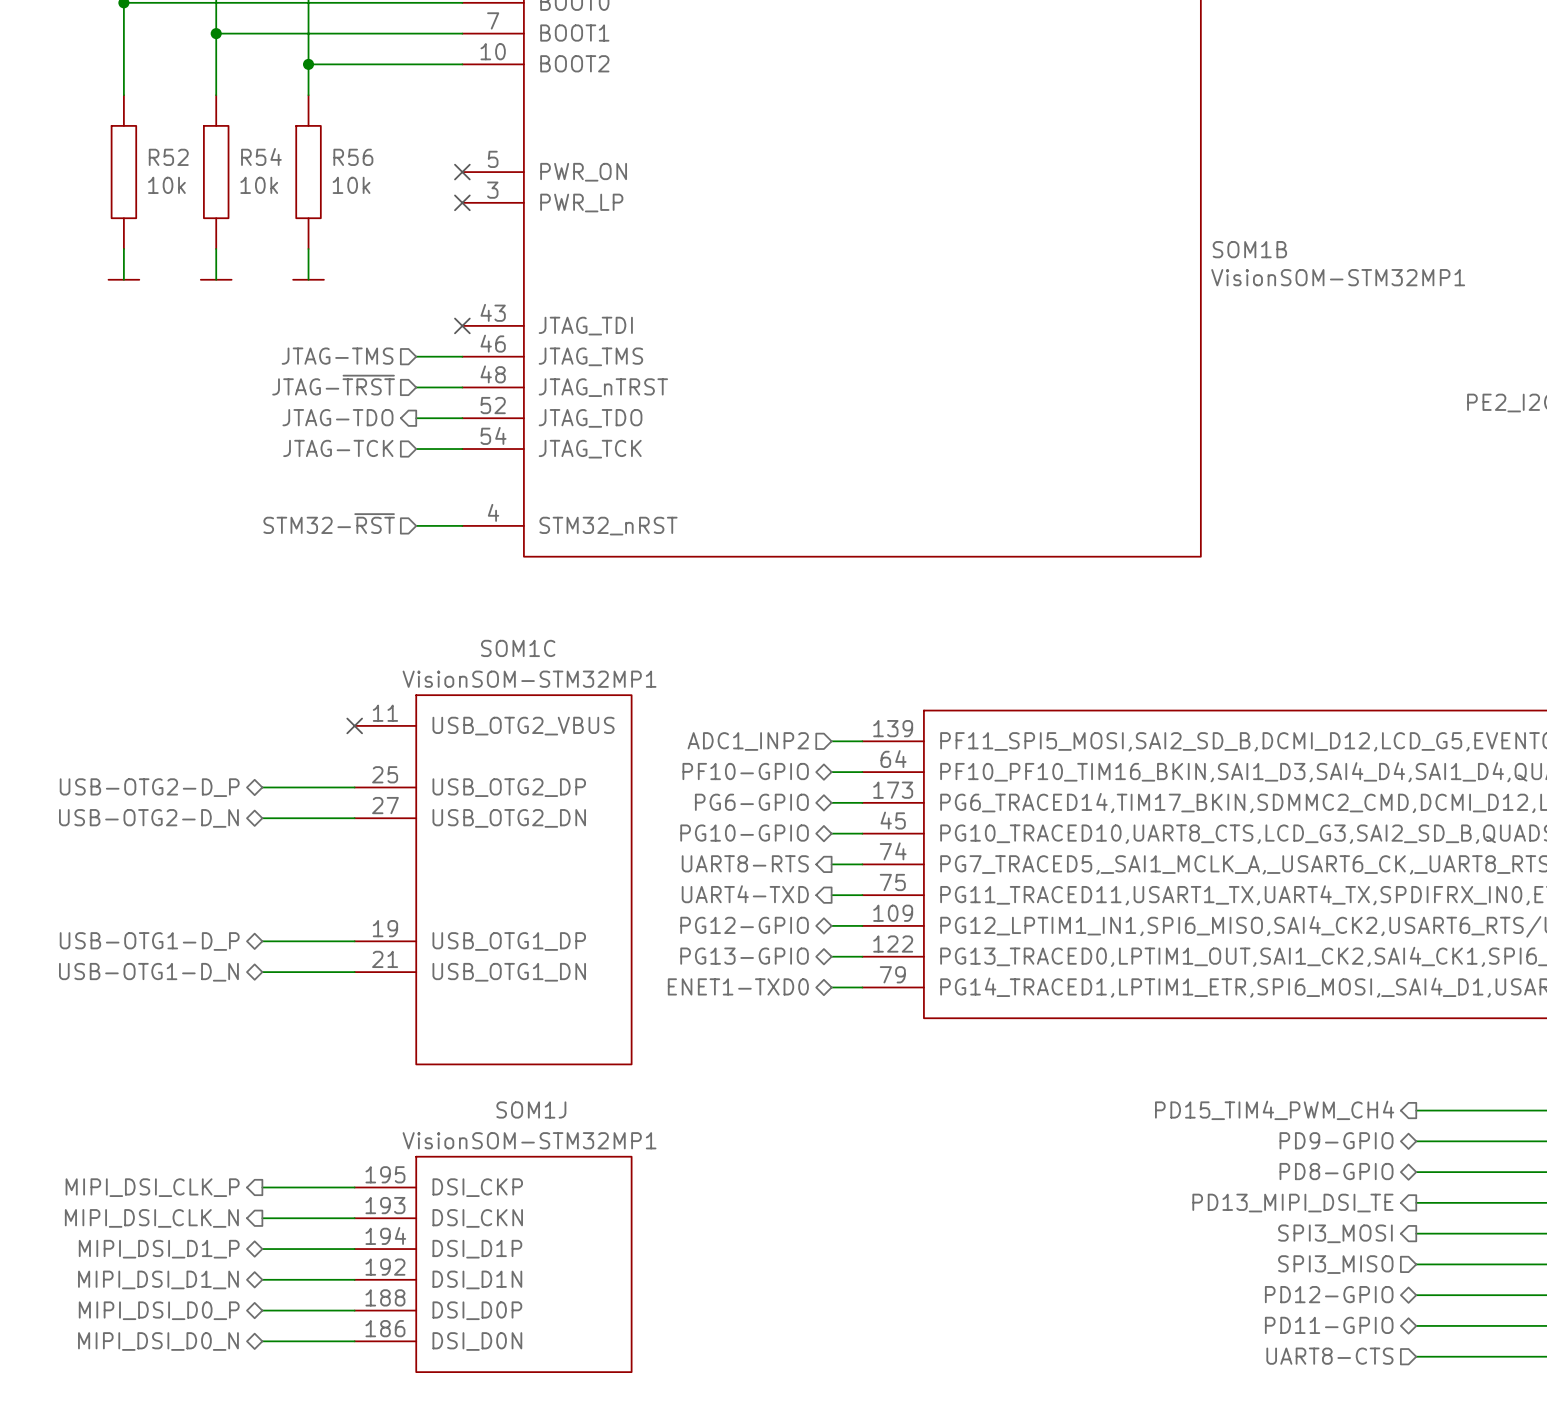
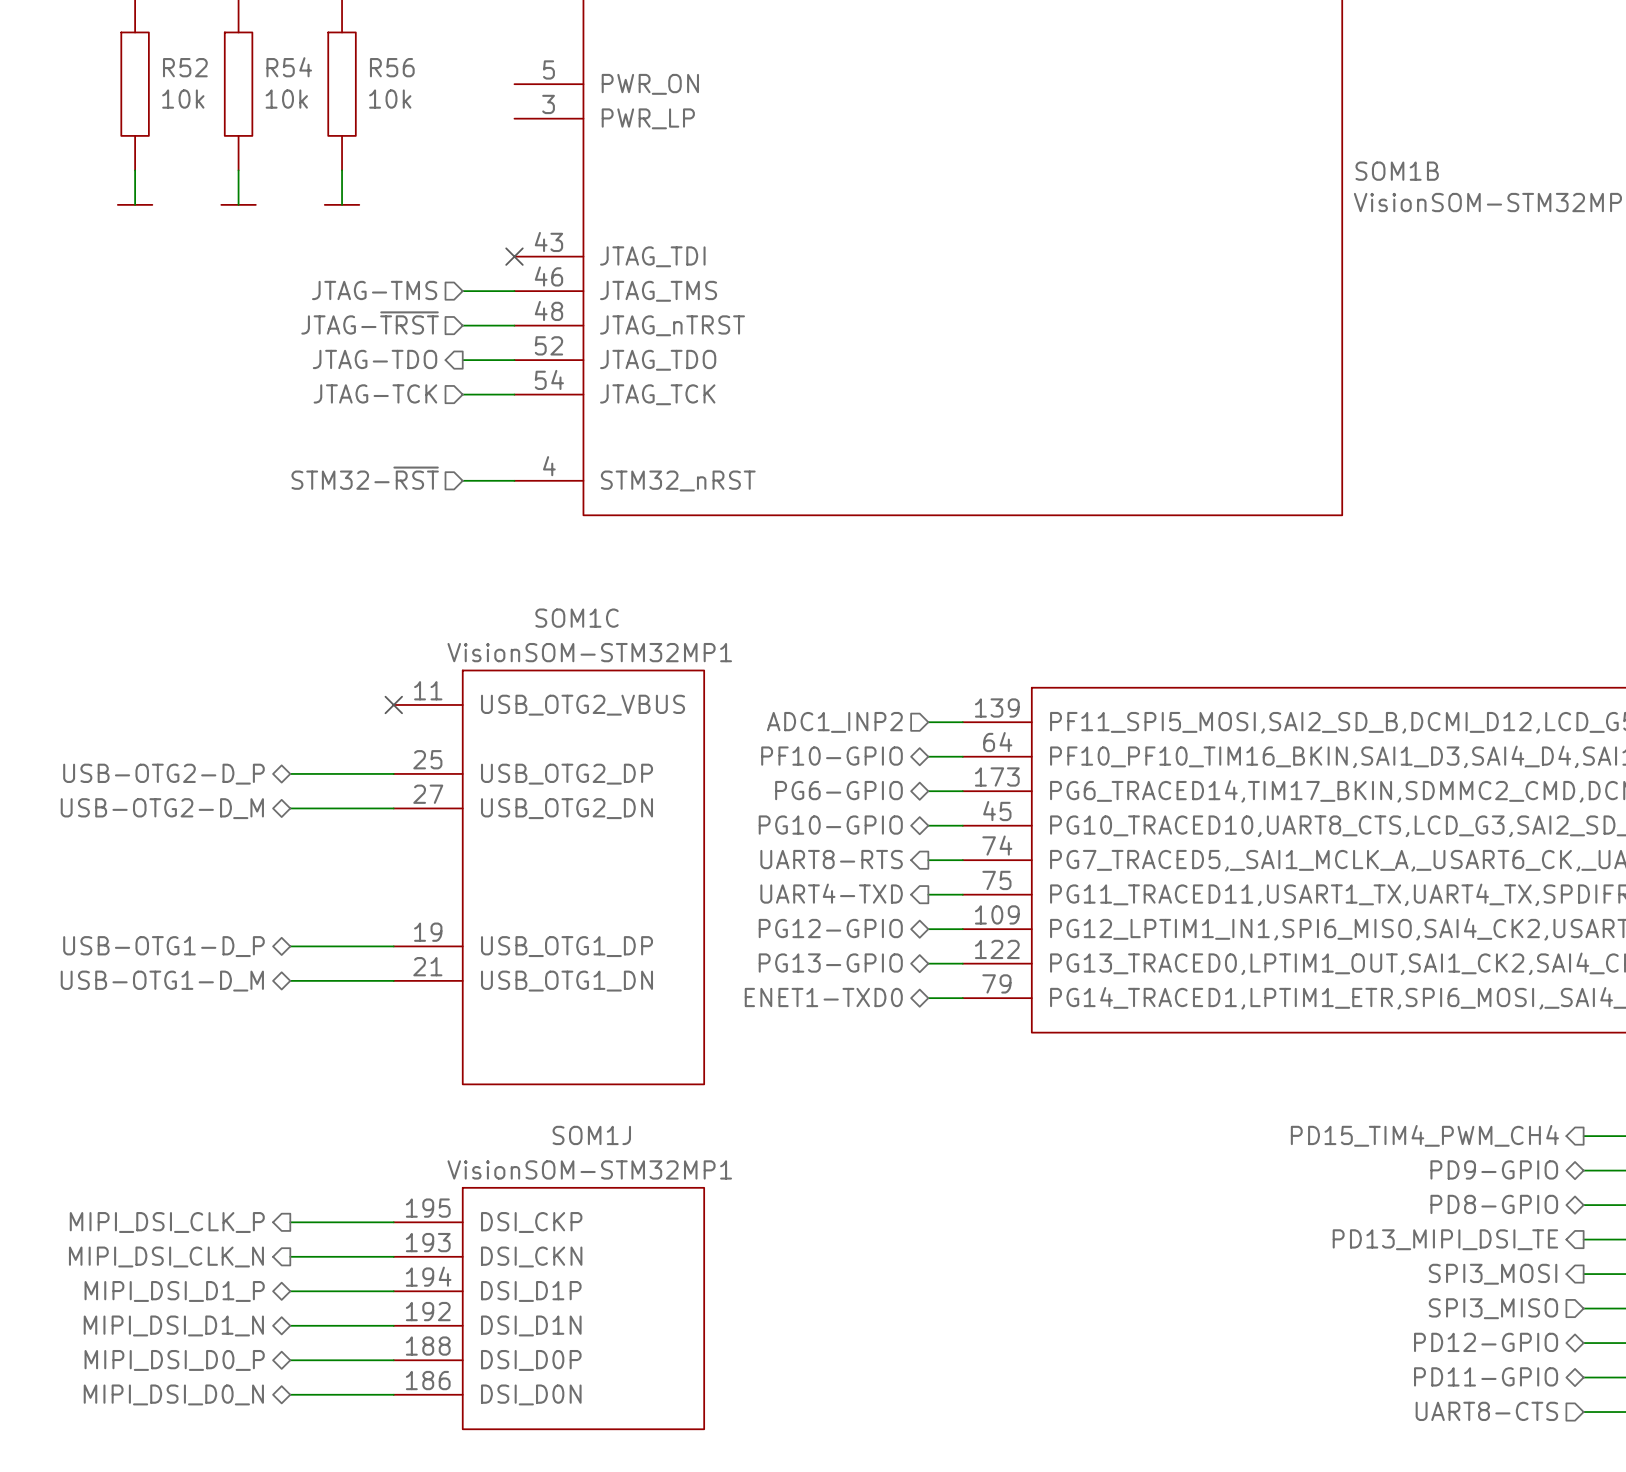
no-connect mark: (462, 172) -> none
no-connect mark: (462, 202) -> none
hierarchical label: USB-OTG2-D_N (148, 818) -> USB-OTG2-D_M (162, 808)
hierarchical label: USB-OTG1-D_N (148, 972) -> USB-OTG1-D_M (162, 981)

